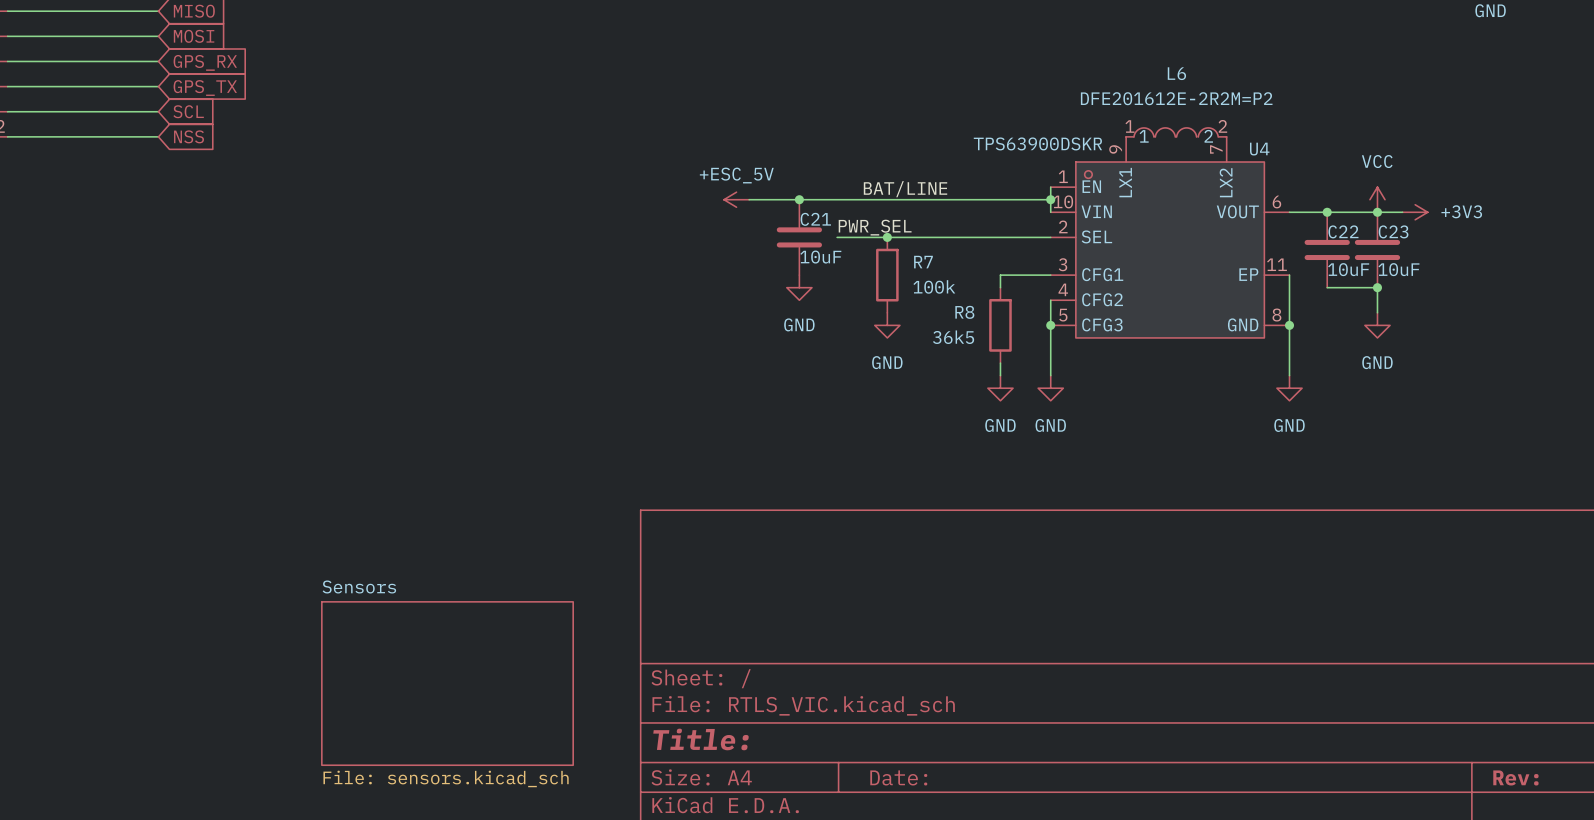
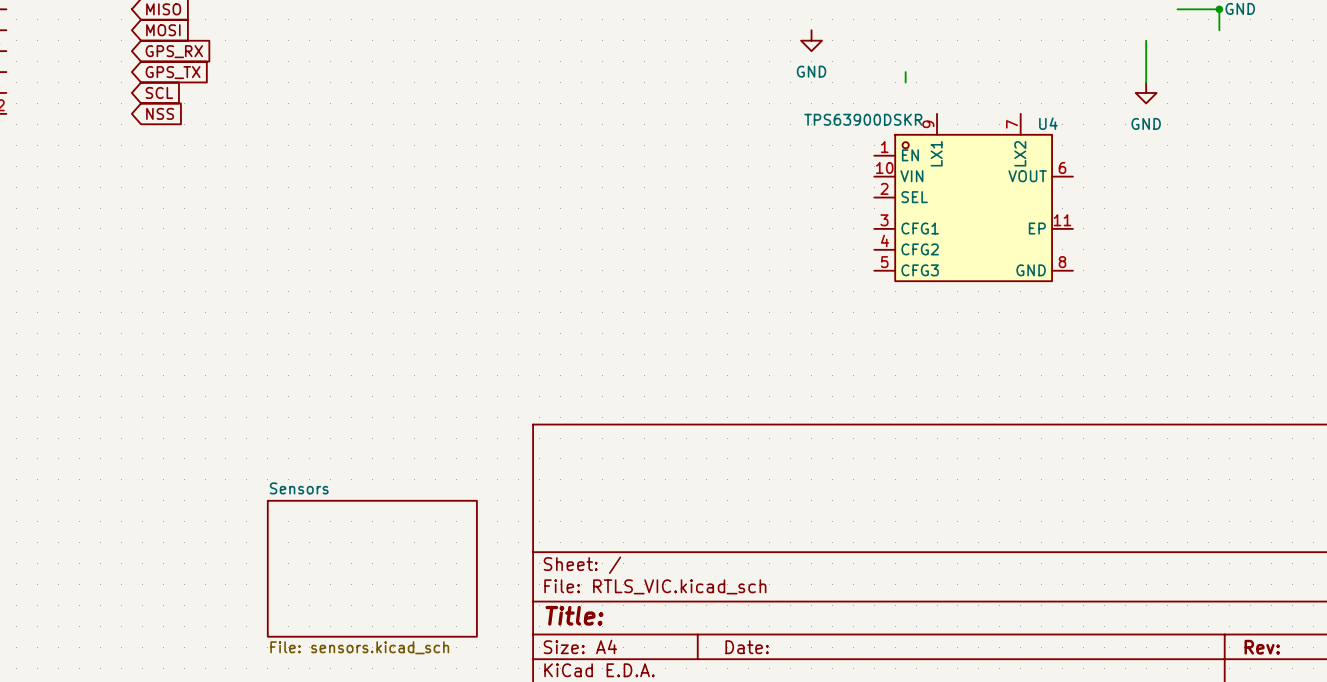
wire: (7, 11) (158, 11) -> none
wire: none -> (1177, 9) (1219, 9) (1219, 30)
junction: none -> (1219, 9)
wire: (7, 36) (158, 36) -> none
power symbol: none -> GND (811, 40)
wire: none -> (1146, 40) (1146, 82)
wire: (7, 61) (158, 61) -> none
wire: (7, 86) (158, 86) -> none
wire: none -> (905, 72) (905, 82)
wire: (7, 111) (158, 111) -> none
power symbol: none -> GND (1146, 92)
L6: DFE201612E-2R2M=P2 (1176, 132) -> none
wire: (7, 136) (158, 136) -> none
wire: (1050, 187) (1050, 212) -> none
label: BAT/LINE (905, 189) -> none
power symbol: +ESC_5V (736, 199) -> none
wire: (749, 199) (1050, 199) -> none
junction: (799, 199) -> none
junction: (1050, 199) -> none
power symbol: VCC (1377, 199) -> none
wire: (1289, 212) (1402, 212) -> none
junction: (1327, 212) -> none
junction: (1377, 212) -> none
power symbol: +3V3 (1415, 212) -> none
label: PWR_SEL (875, 227) -> none
C21: 10uF (799, 237) -> none
wire: (837, 237) (1050, 237) -> none
junction: (887, 237) -> none
C22: 10uF (1327, 249) -> none
C23: 10uF (1377, 249) -> none
R7: 100k (887, 275) -> none
wire: (1050, 275) (1000, 275) (1000, 287) -> none
wire: (1289, 275) (1289, 375) -> none
power symbol: GND (799, 287) -> none
wire: (1327, 287) (1377, 287) (1377, 312) -> none
junction: (1377, 287) -> none
wire: (1050, 300) (1050, 375) -> none
power symbol: GND (887, 325) -> none
R8: 36k5 (1000, 325) -> none
junction: (1050, 325) -> none
junction: (1289, 325) -> none
power symbol: GND (1377, 325) -> none
wire: (1000, 363) (1000, 375) -> none
power symbol: GND (1000, 388) -> none
power symbol: GND (1050, 388) -> none
power symbol: GND (1289, 388) -> none

